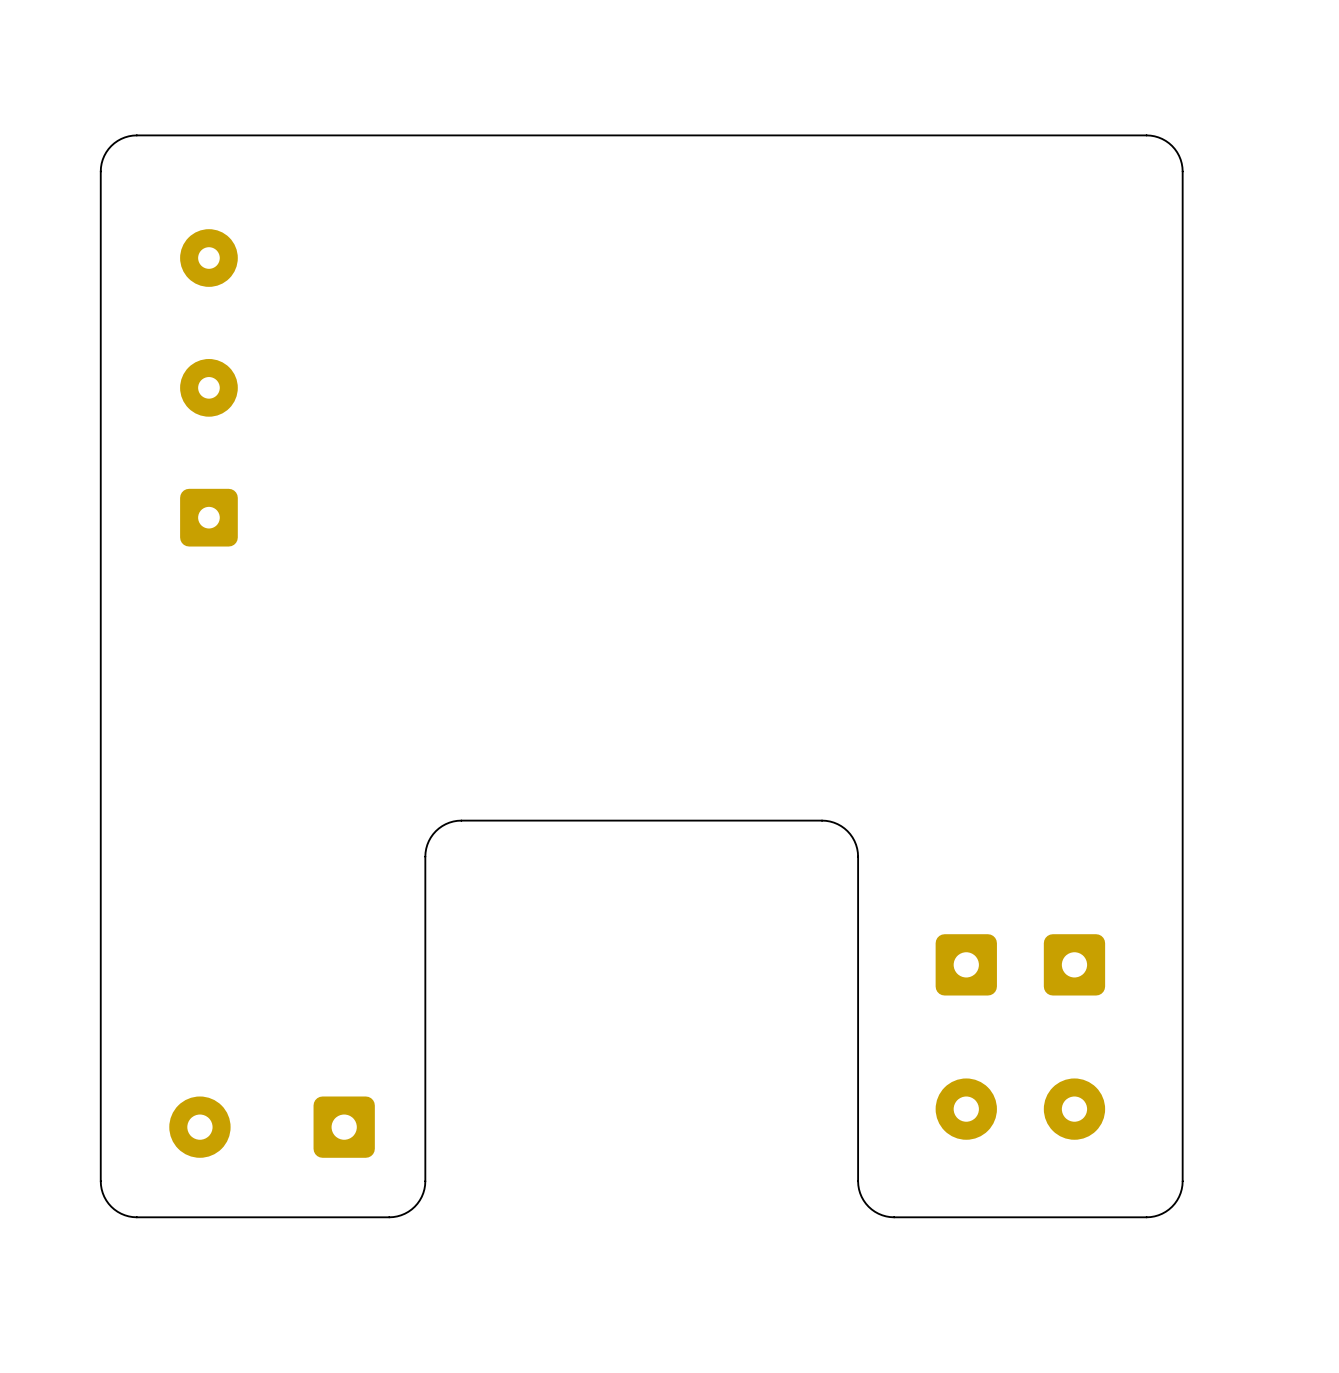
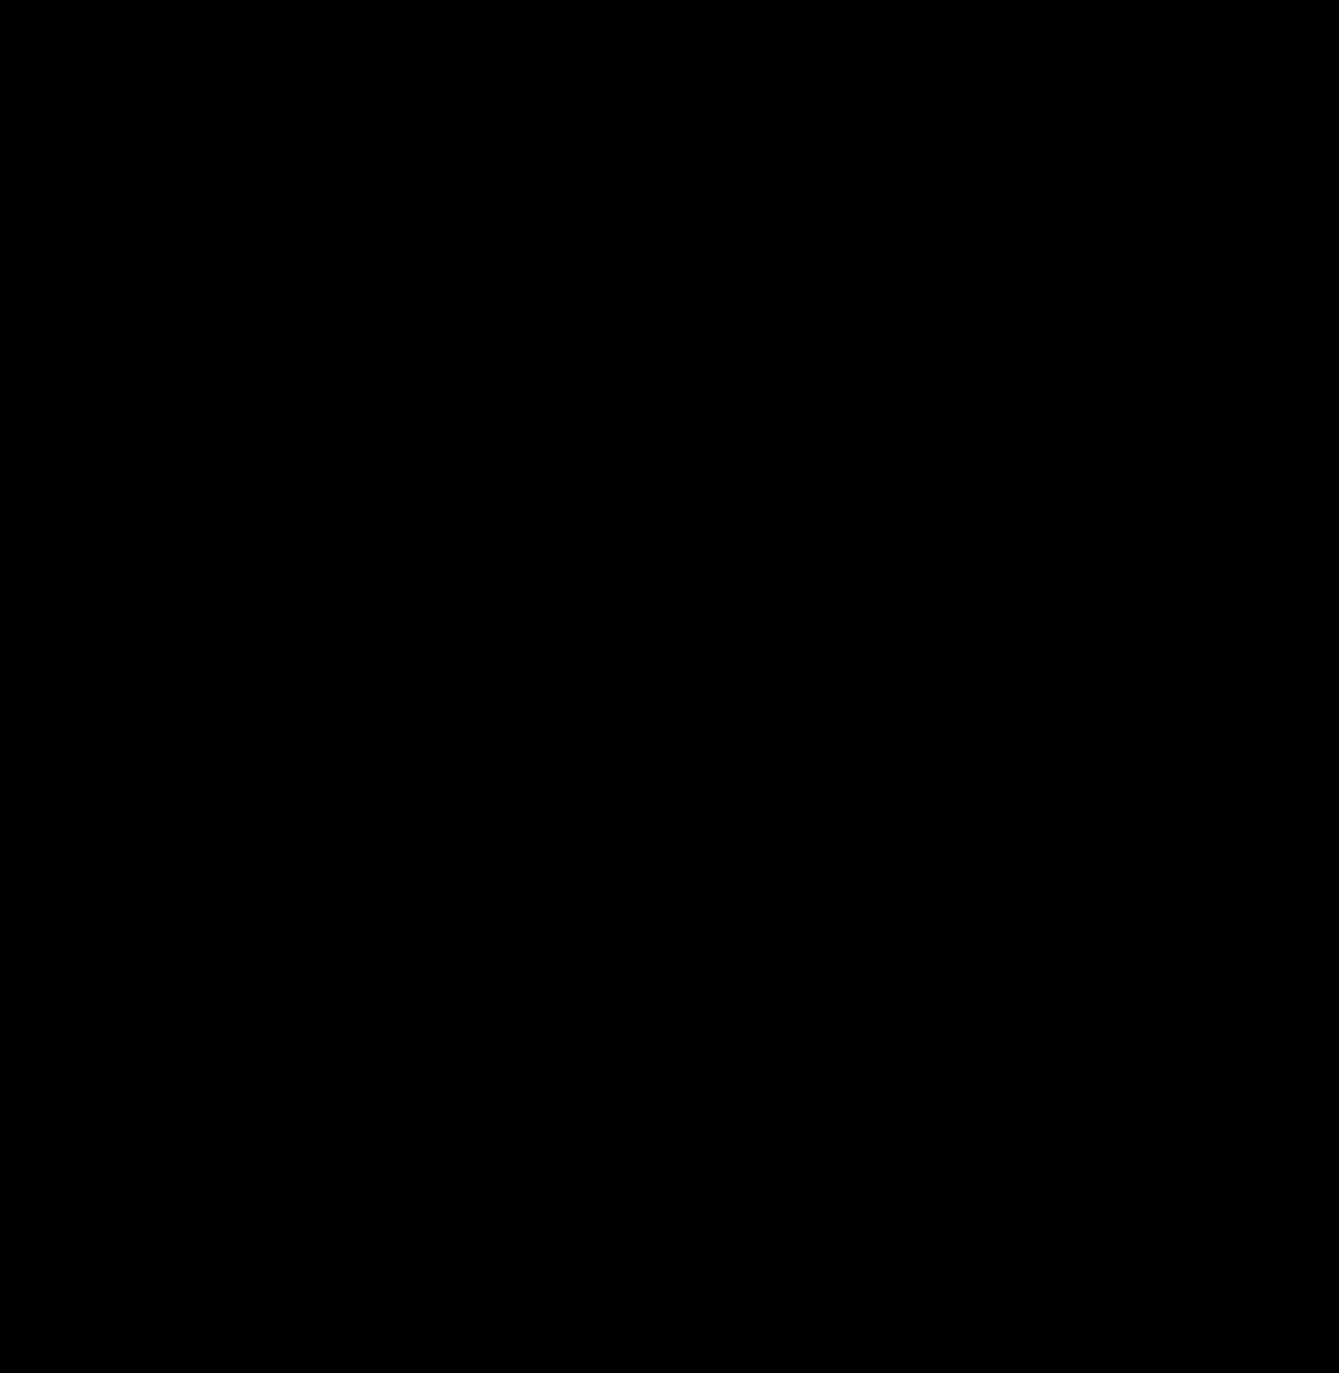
board edge: (1146, 135) (136, 135) (124, 137) (111, 145) (104, 155) (100, 171) (100, 1181) (104, 1196) (111, 1206) (124, 1215) (136, 1217) (389, 1217) (404, 1213) (414, 1206) (421, 1196) (425, 1181) (425, 852) (428, 841) (438, 828) (449, 822) (461, 820) (822, 820) (837, 824) (850, 834) (857, 852) (858, 1181) (860, 1193) (865, 1203) (878, 1213) (894, 1217) (1146, 1217) (1158, 1215) (1172, 1206) (1179, 1196) (1182, 1181) (1182, 171) (1180, 159) (1172, 145) (1162, 138) (1146, 135) -> none
part: (208, 387) -> none
part: (966, 1036) -> none
part: (1074, 1036) -> none
part: (272, 1127) -> none

